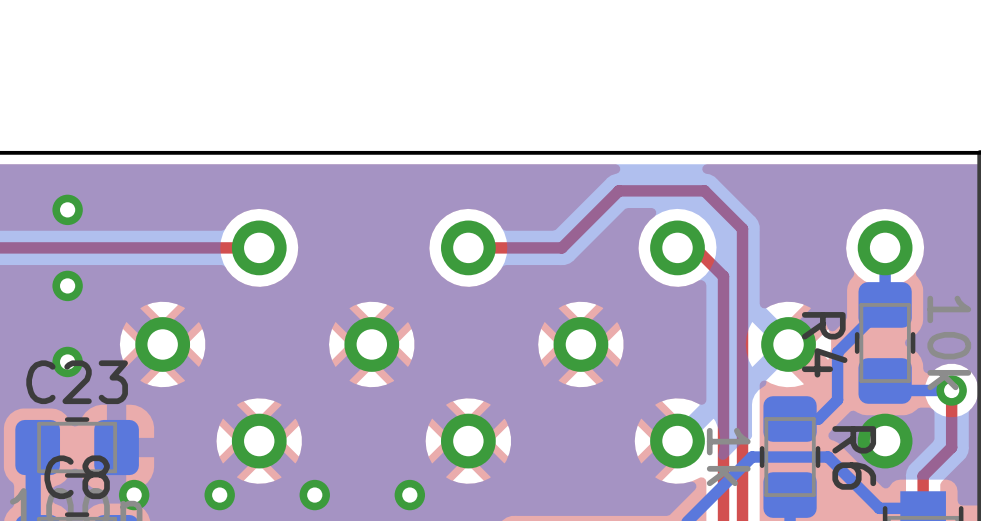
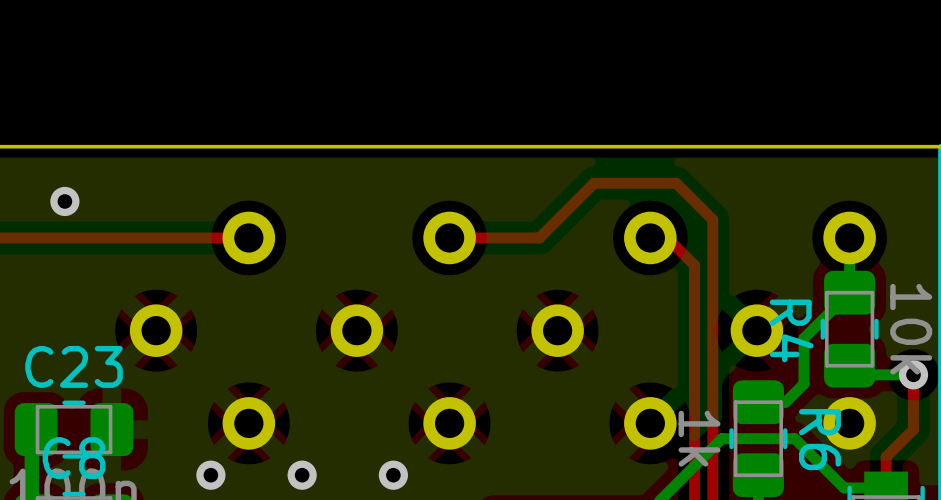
via: (67, 285) -> none
via: (67, 361) -> none
via: (134, 495) -> none

